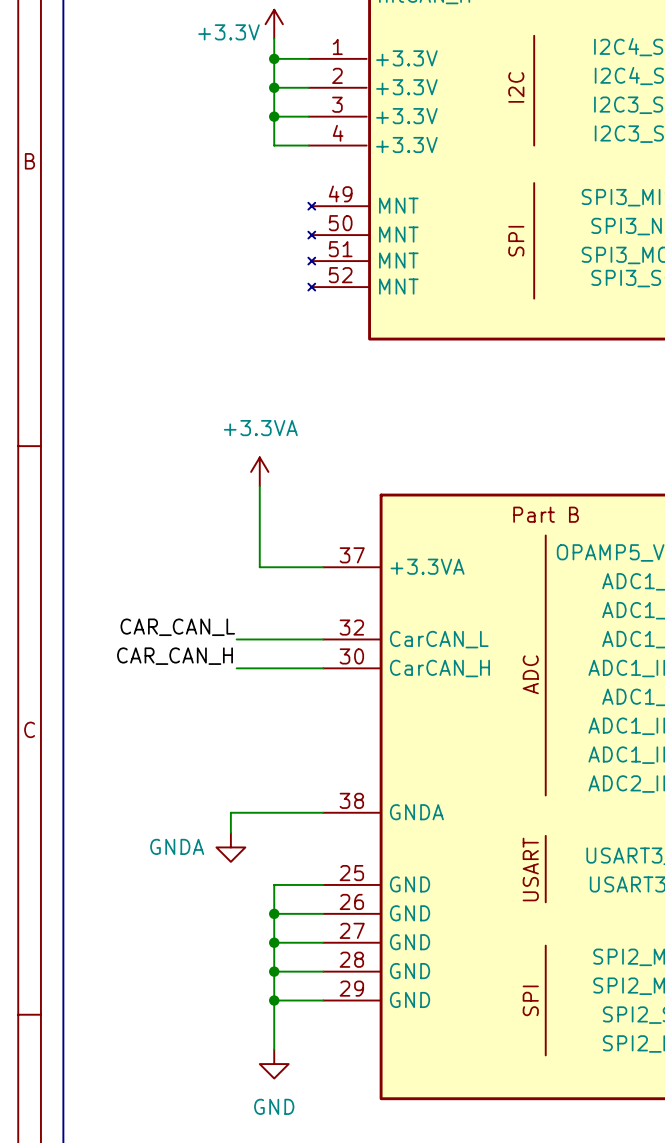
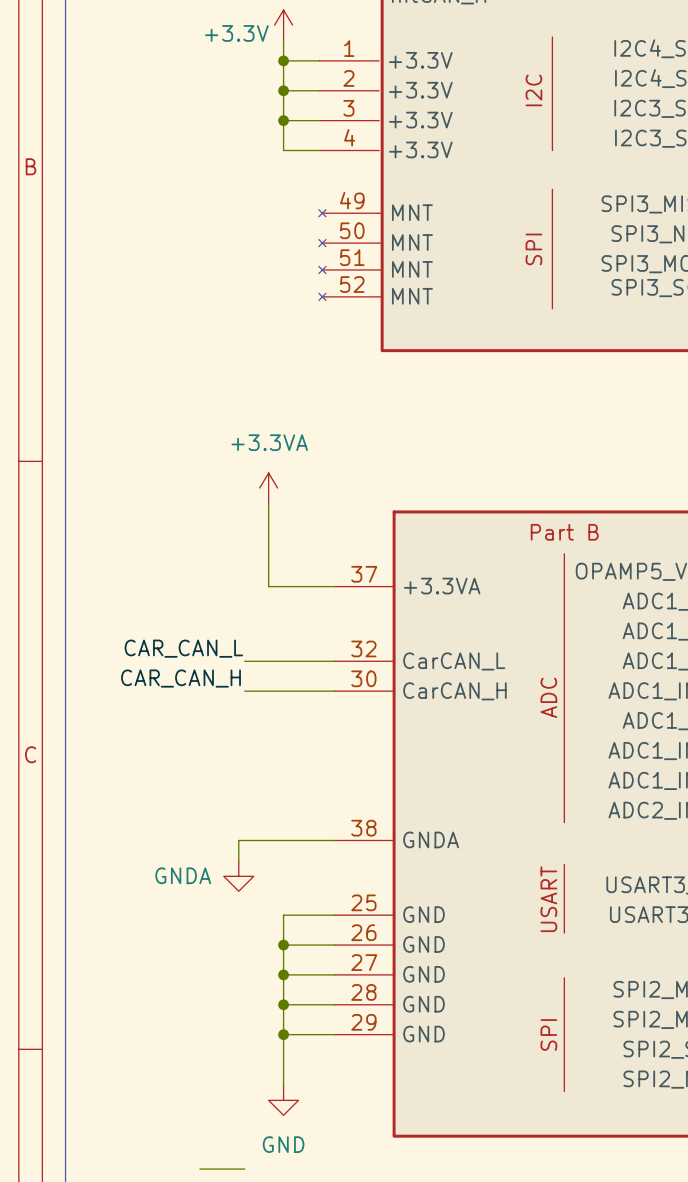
wire: none -> (199, 1169) (244, 1169)

